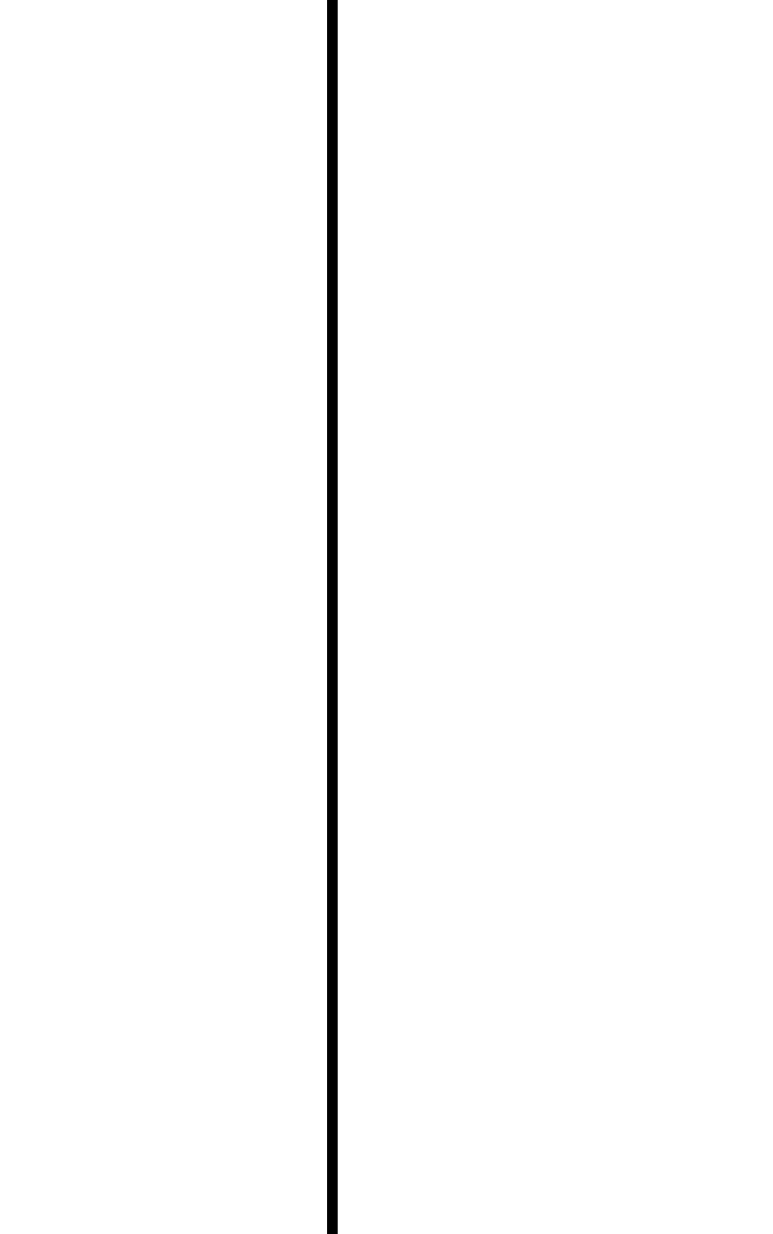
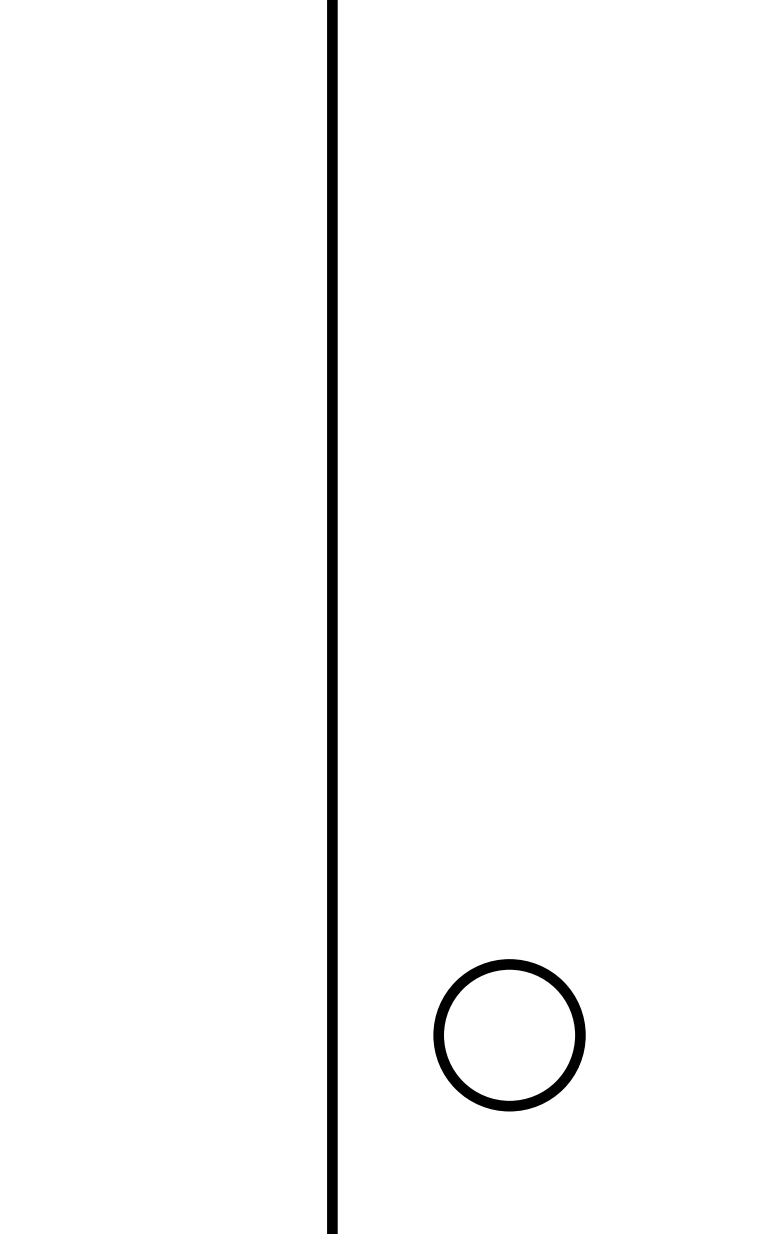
round board edge: none -> [433, 959, 586, 1112]

